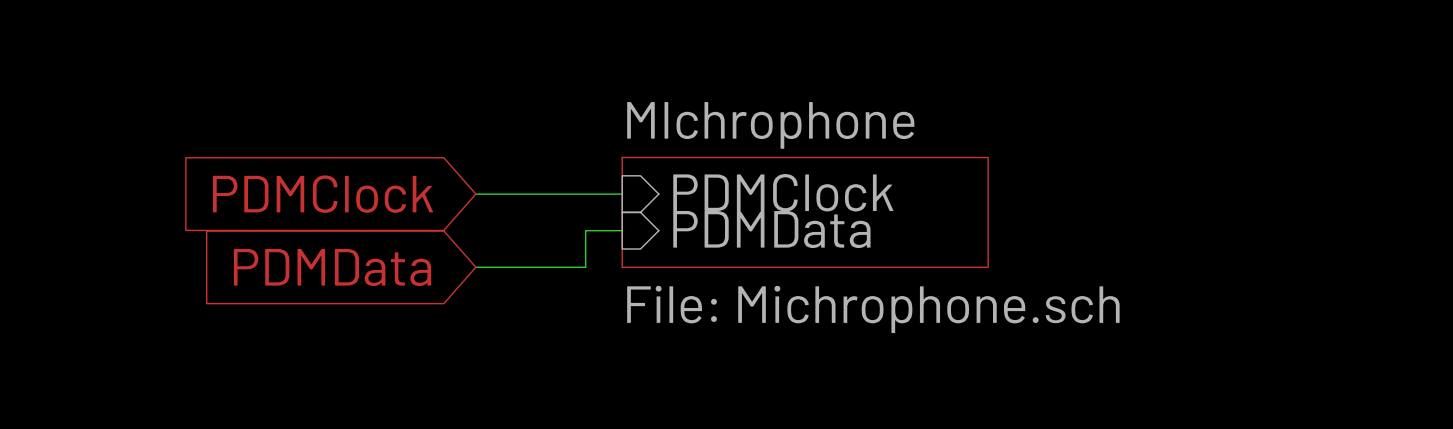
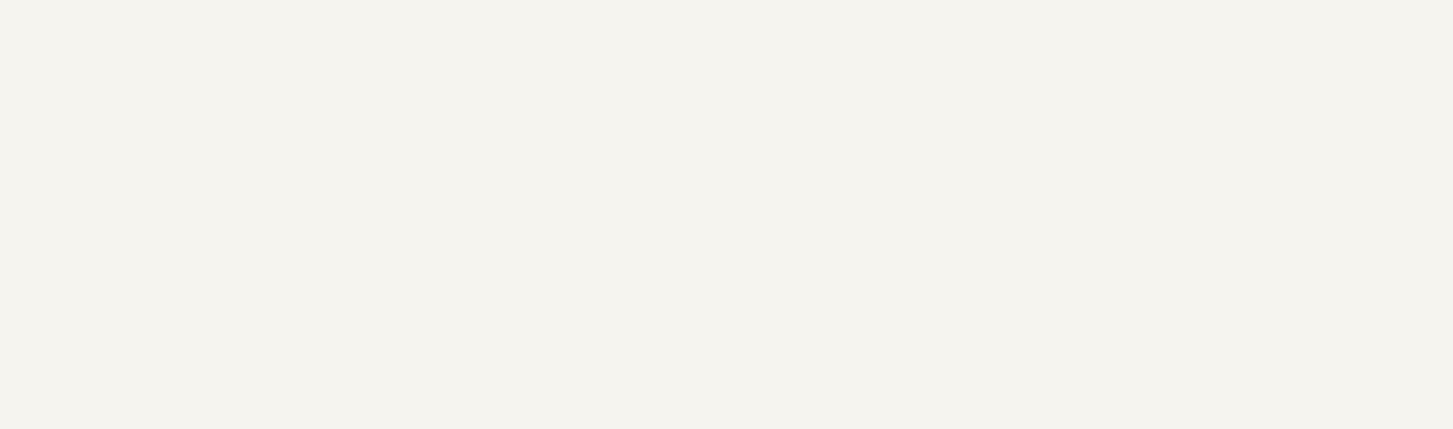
sheet pin: PDMClock (783, 192) -> none
global label: PDMClock (323, 194) -> none
wire: (475, 194) (622, 194) -> none
sheet MIchrophone: File: Michrophone.sch (805, 212) -> none
sheet pin: PDMData (771, 229) -> none
wire: (622, 230) (585, 230) (585, 267) (475, 267) -> none
global label: PDMData (332, 267) -> none

